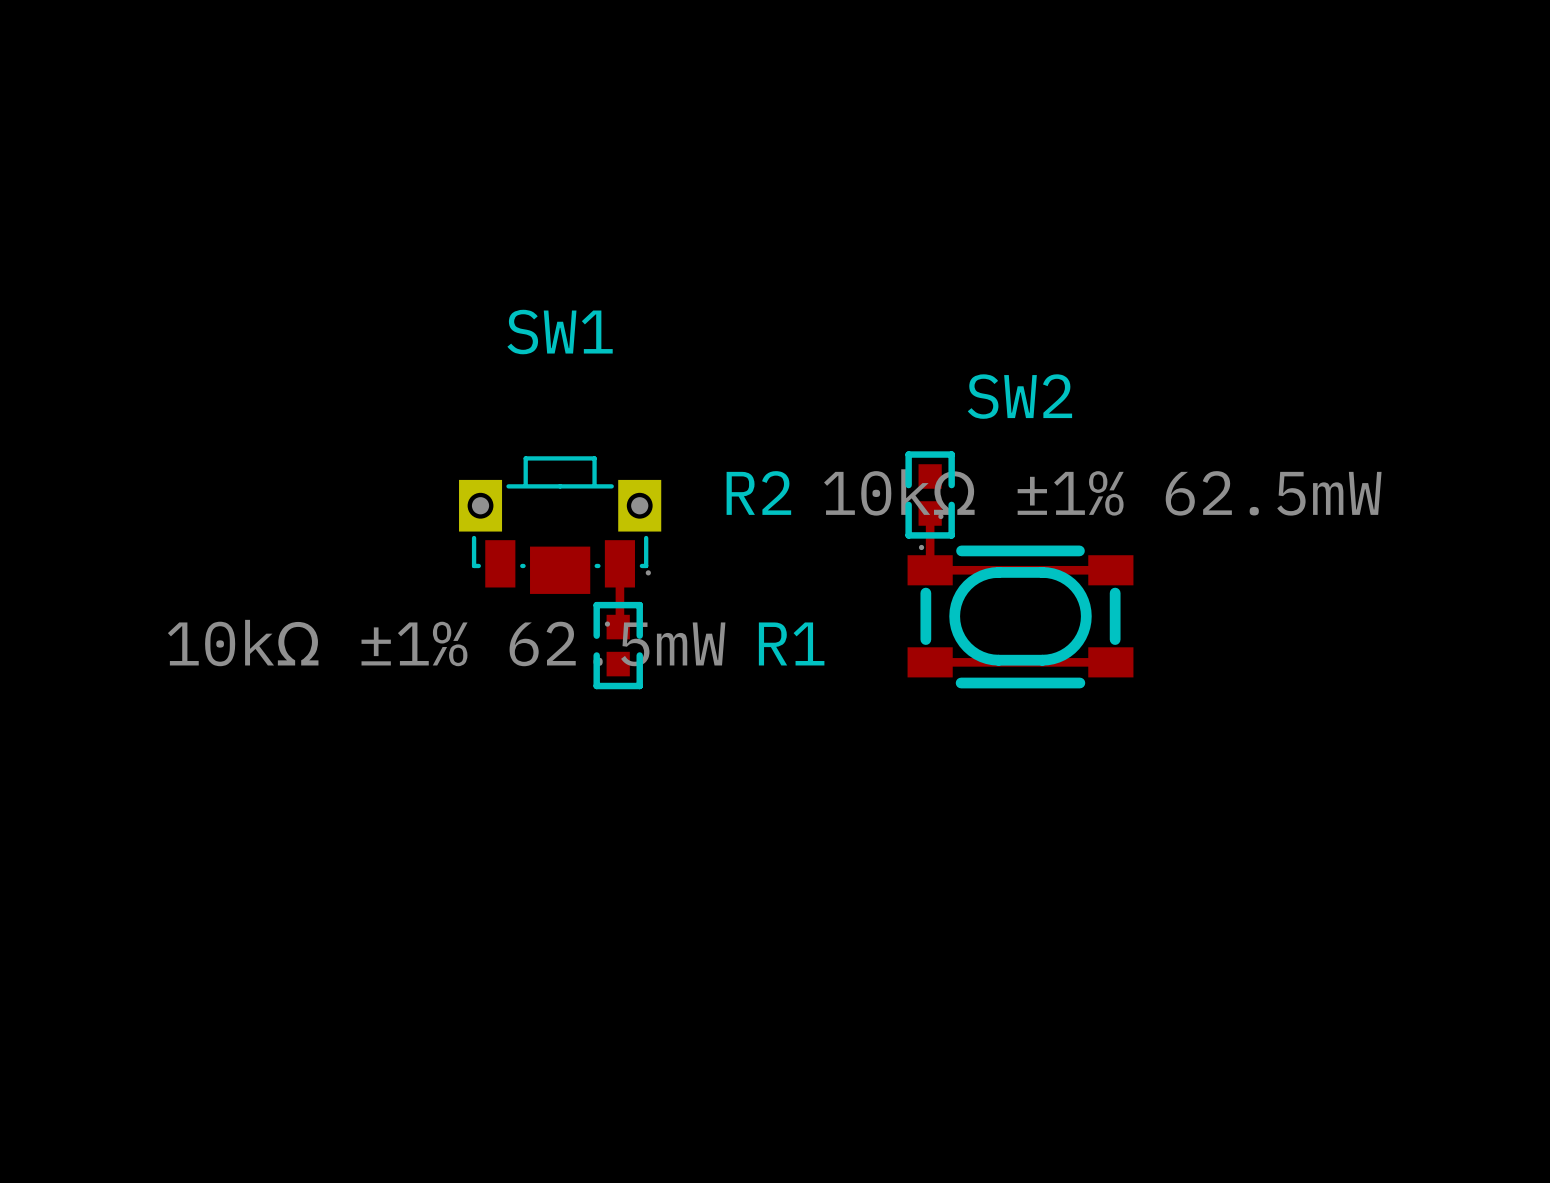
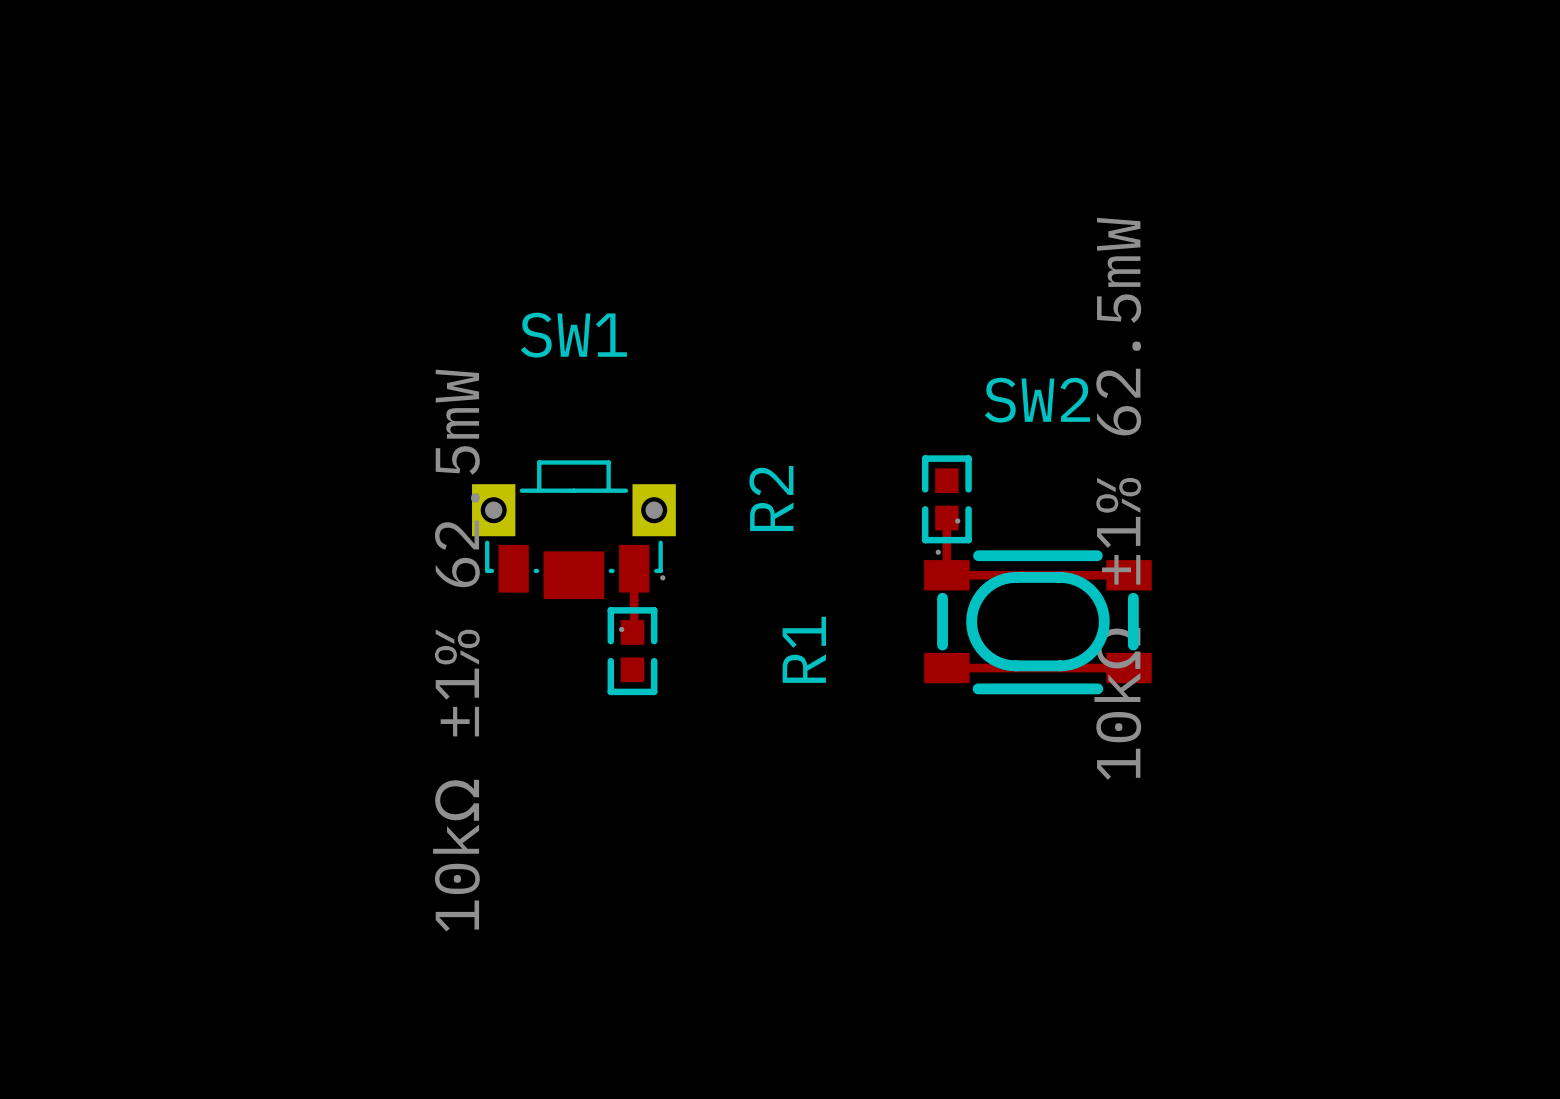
R2 value rotation: 0° (1102, 492) -> 90° counterclockwise (1117, 498)
R2 name rotation: 0° (758, 493) -> 90° counterclockwise (771, 498)
R1 value rotation: 0° (446, 643) -> 90° counterclockwise (456, 650)
R1 name rotation: 0° (791, 643) -> 90° counterclockwise (804, 649)

